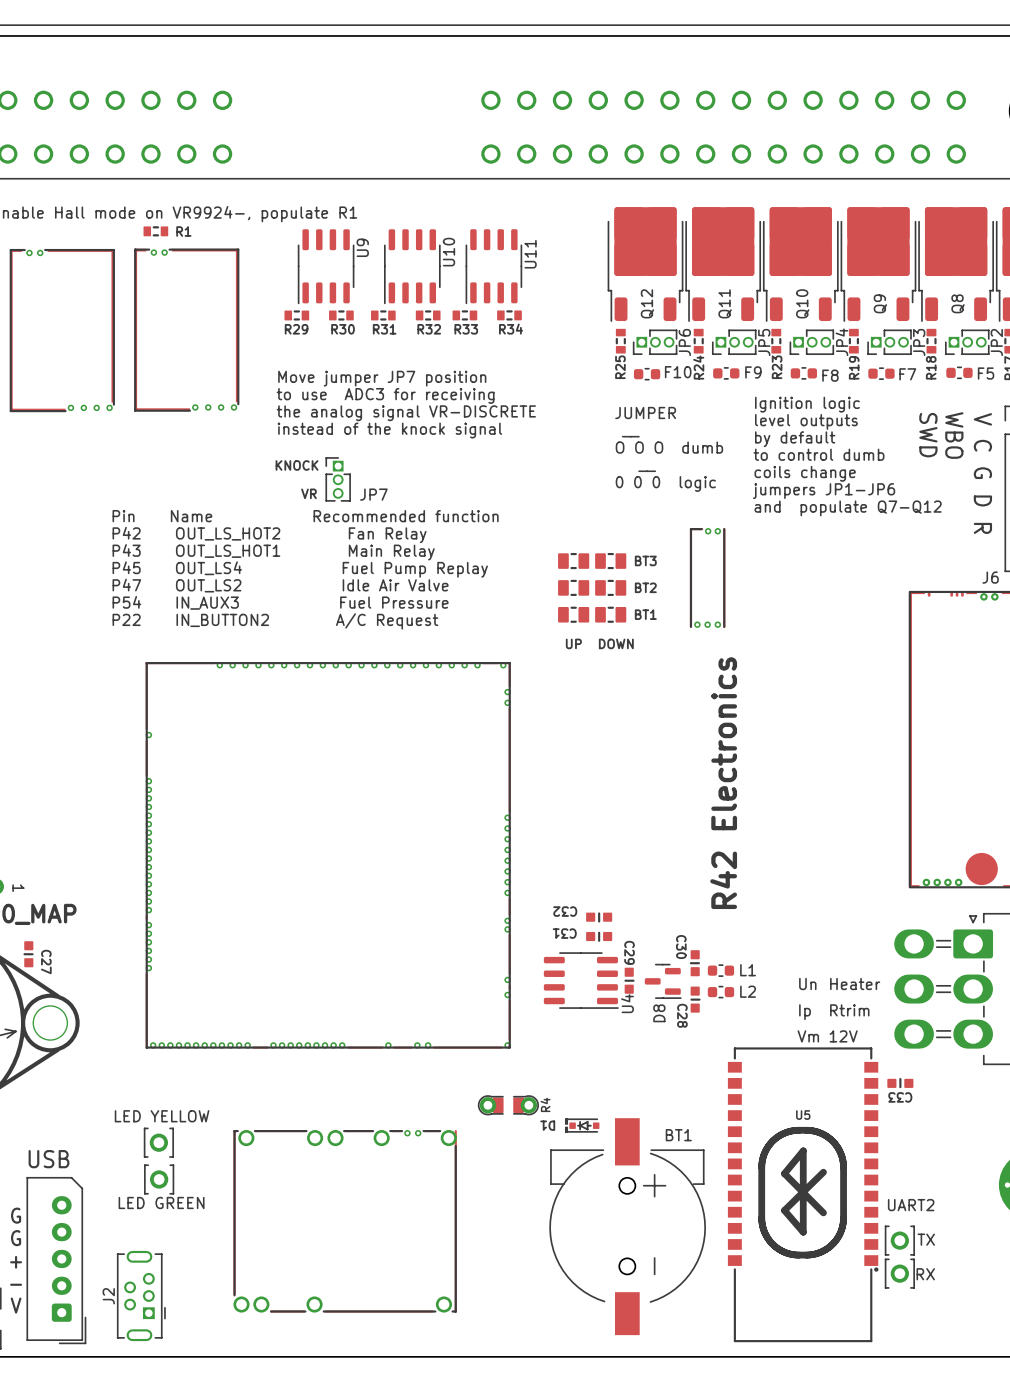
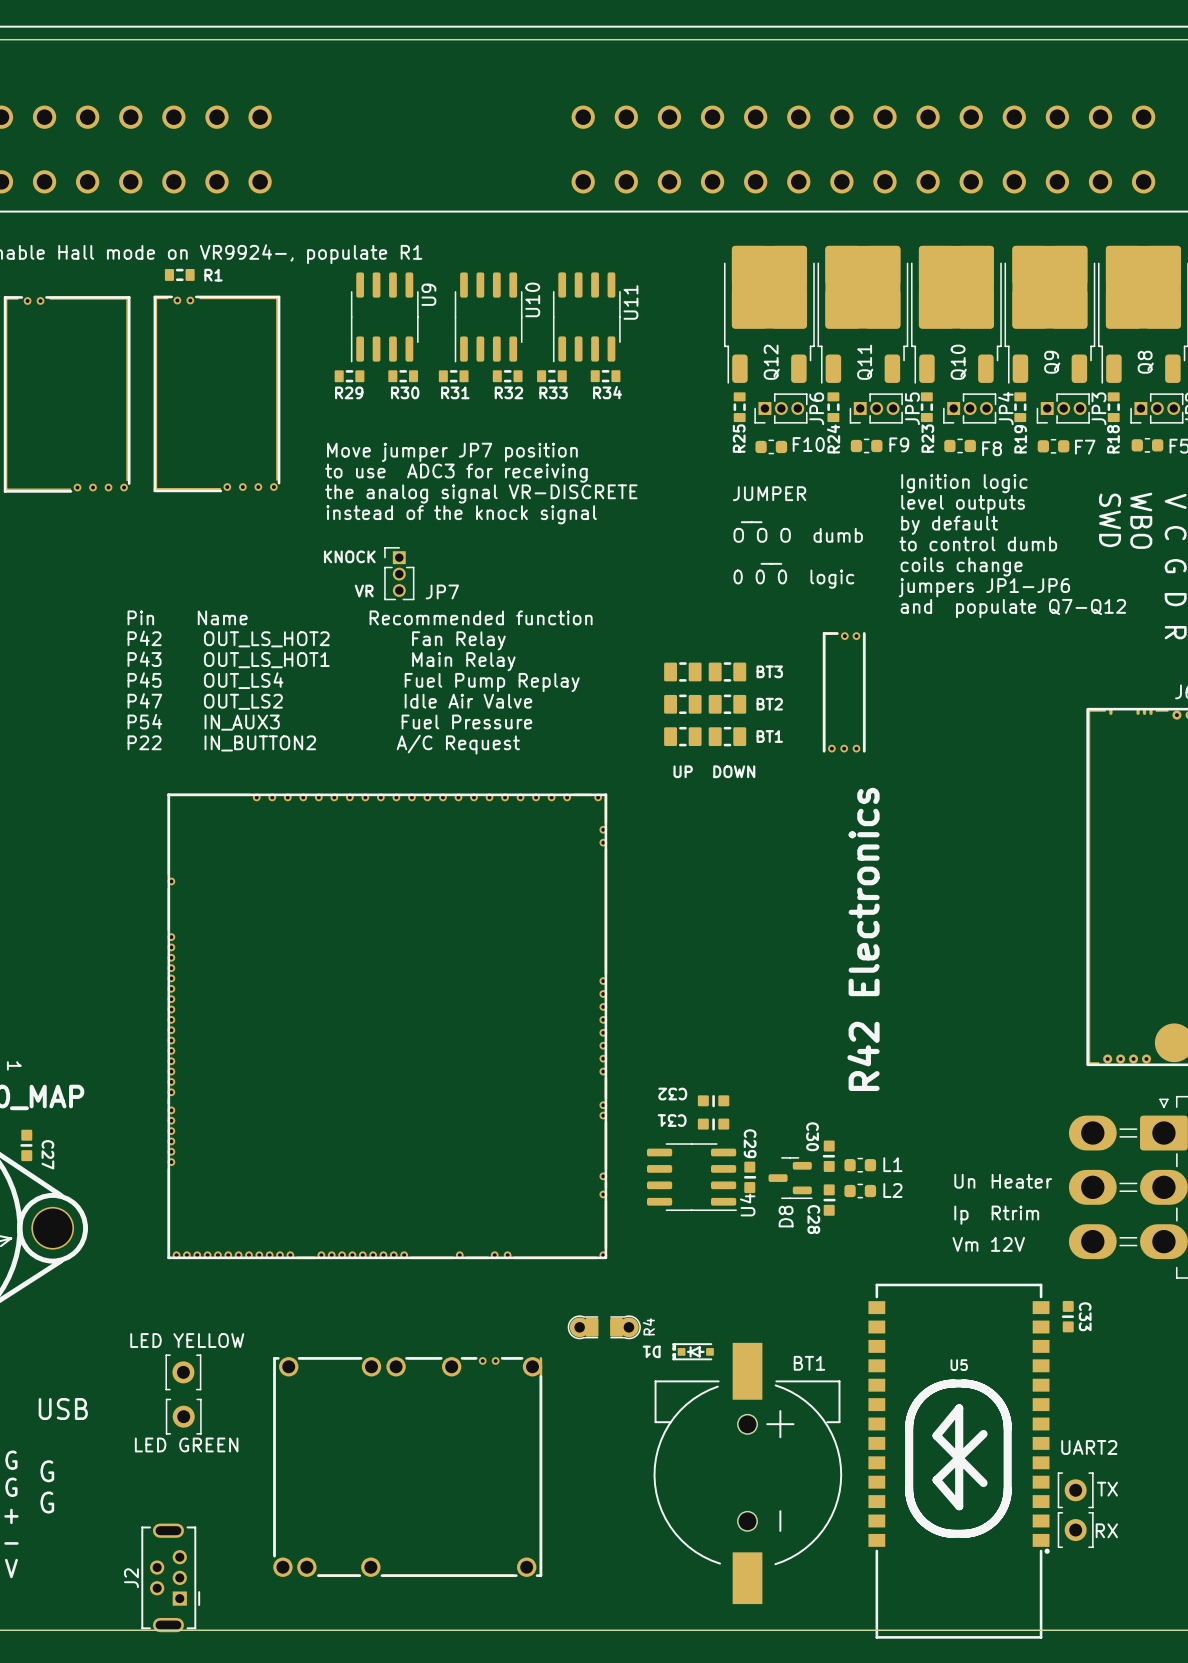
C33 rotation: 0° (900, 1083) -> 90° counterclockwise (1067, 1316)
text position: USB (48, 1159) -> USB (63, 1409)
U5 position: (803, 1194) -> (959, 1461)
text: none -> G (47, 1471)
text: none -> G (47, 1502)
part: (56, 1260) -> none
J2 position: (141, 1296) -> (170, 1577)

